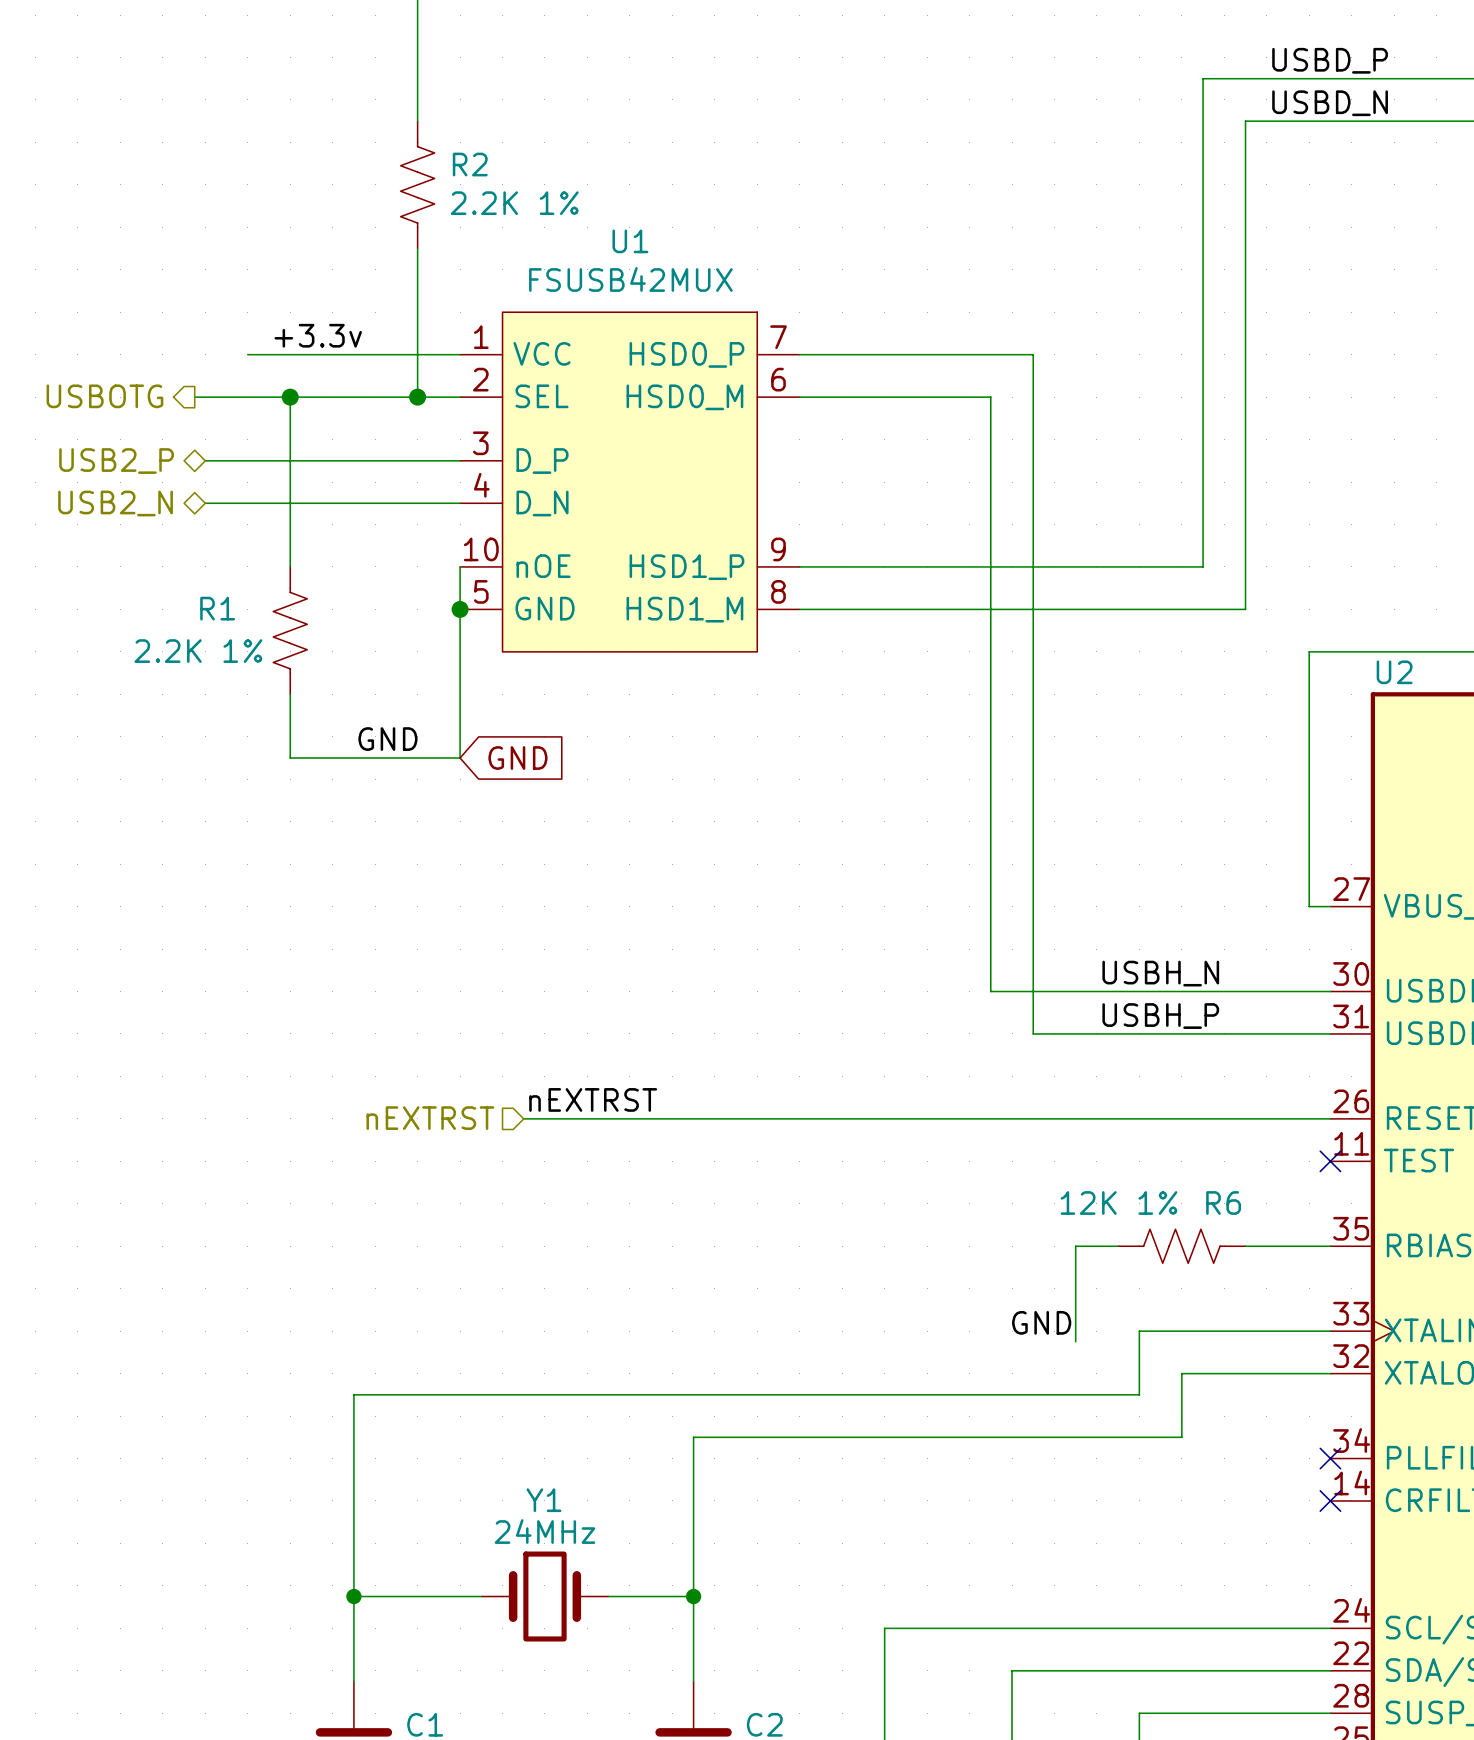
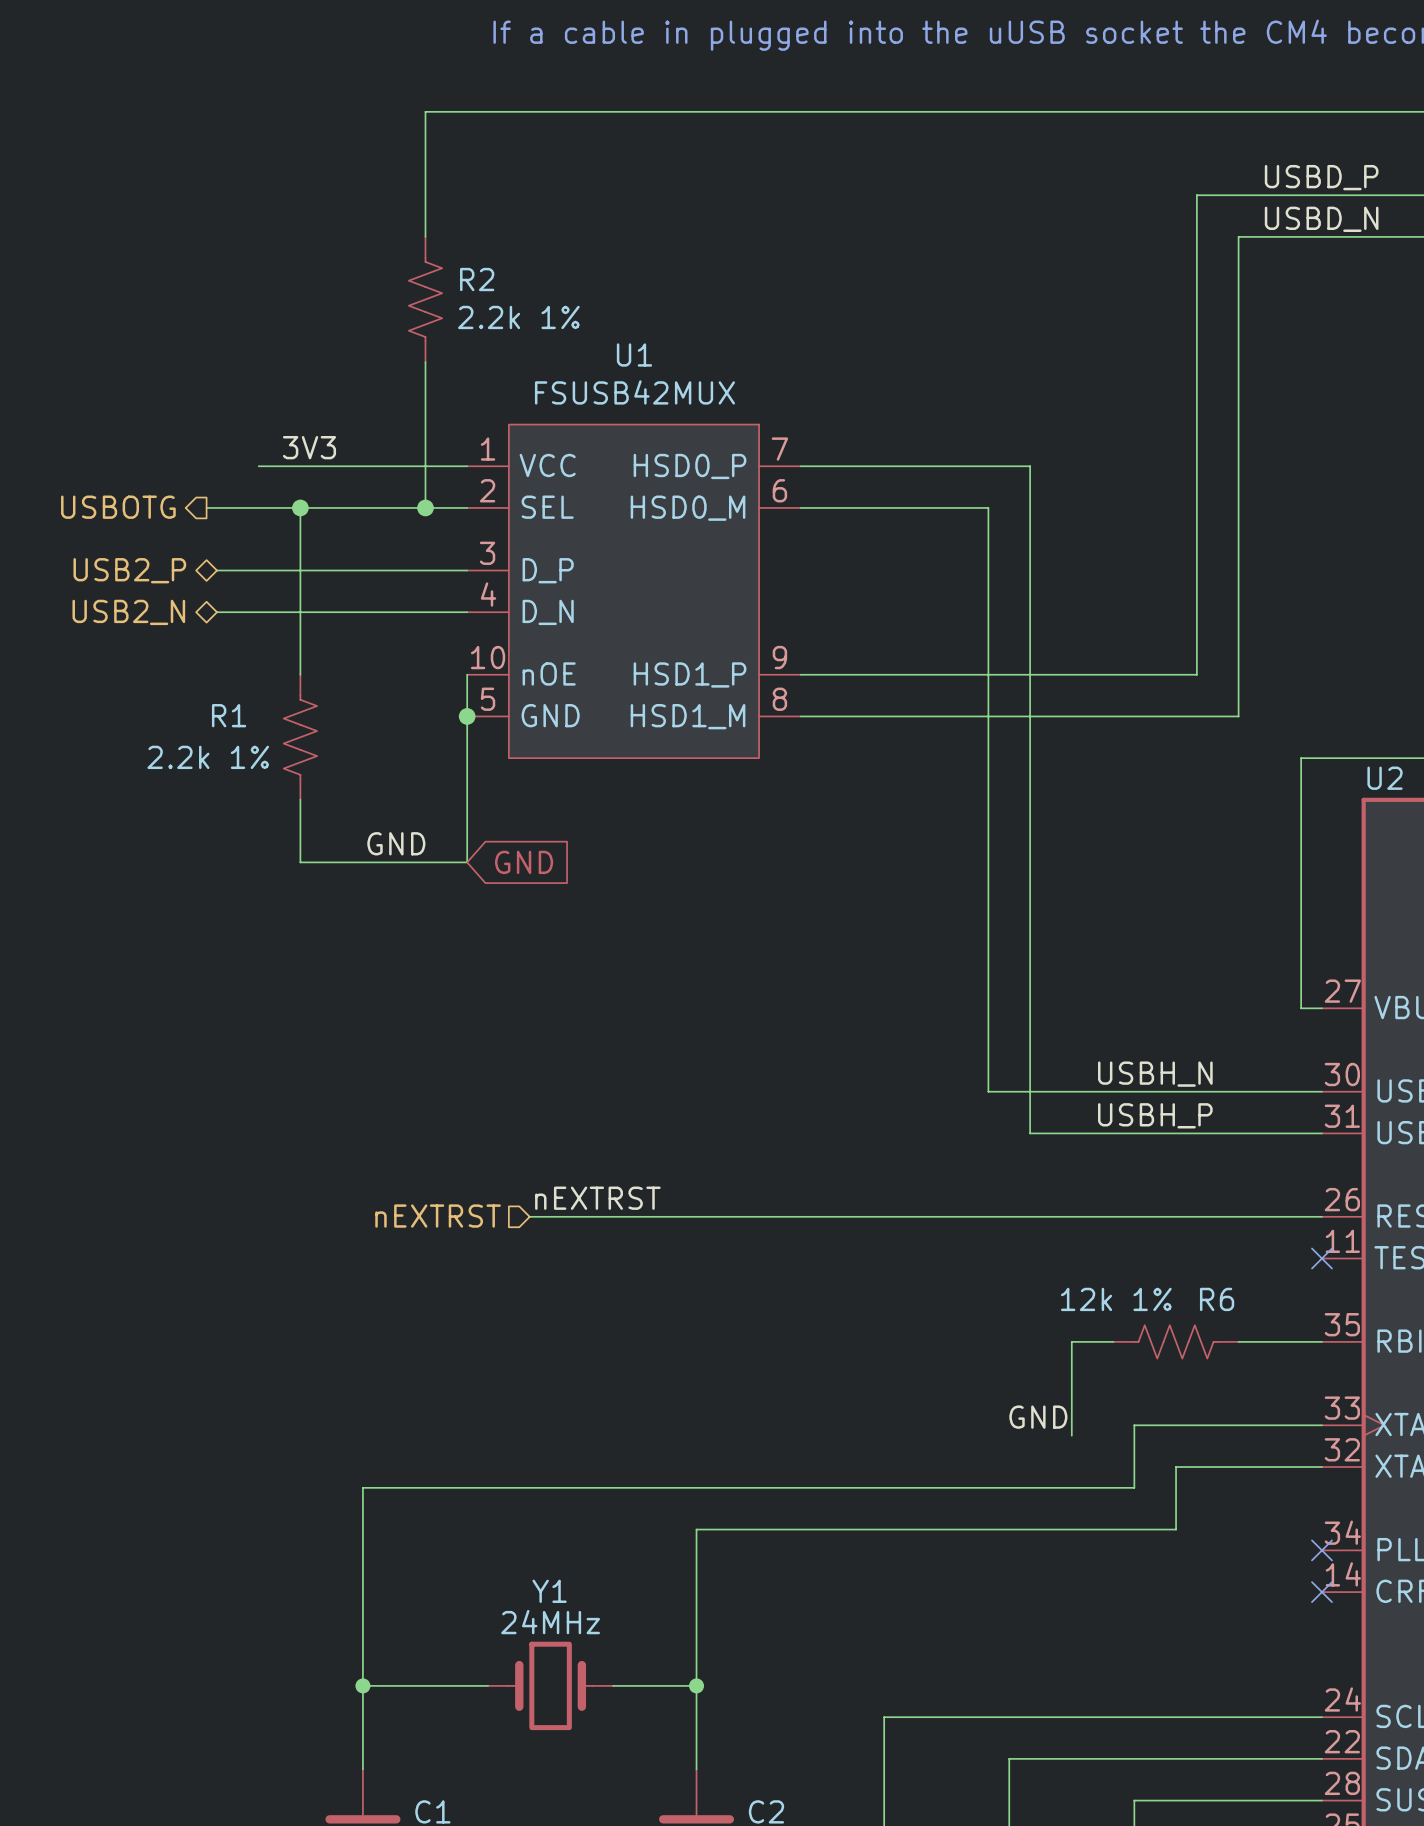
R2 value: 2.2K 1% (514, 203) -> 2.2k 1% (518, 317)
label: +3.3v (318, 335) -> 3V3 (309, 447)
R1 value: 2.2K 1% (198, 651) -> 2.2k 1% (208, 757)
R6 value: 12K 1% (1118, 1203) -> 12k 1% (1116, 1299)

